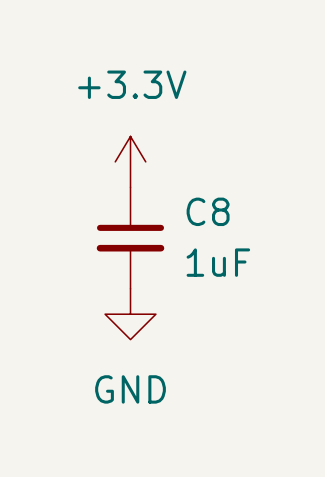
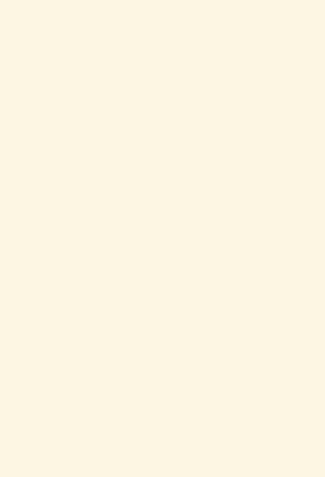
power symbol: +3.3V (130, 161) -> none
C8: 1uF (130, 238) -> none
power symbol: GND (130, 314) -> none

